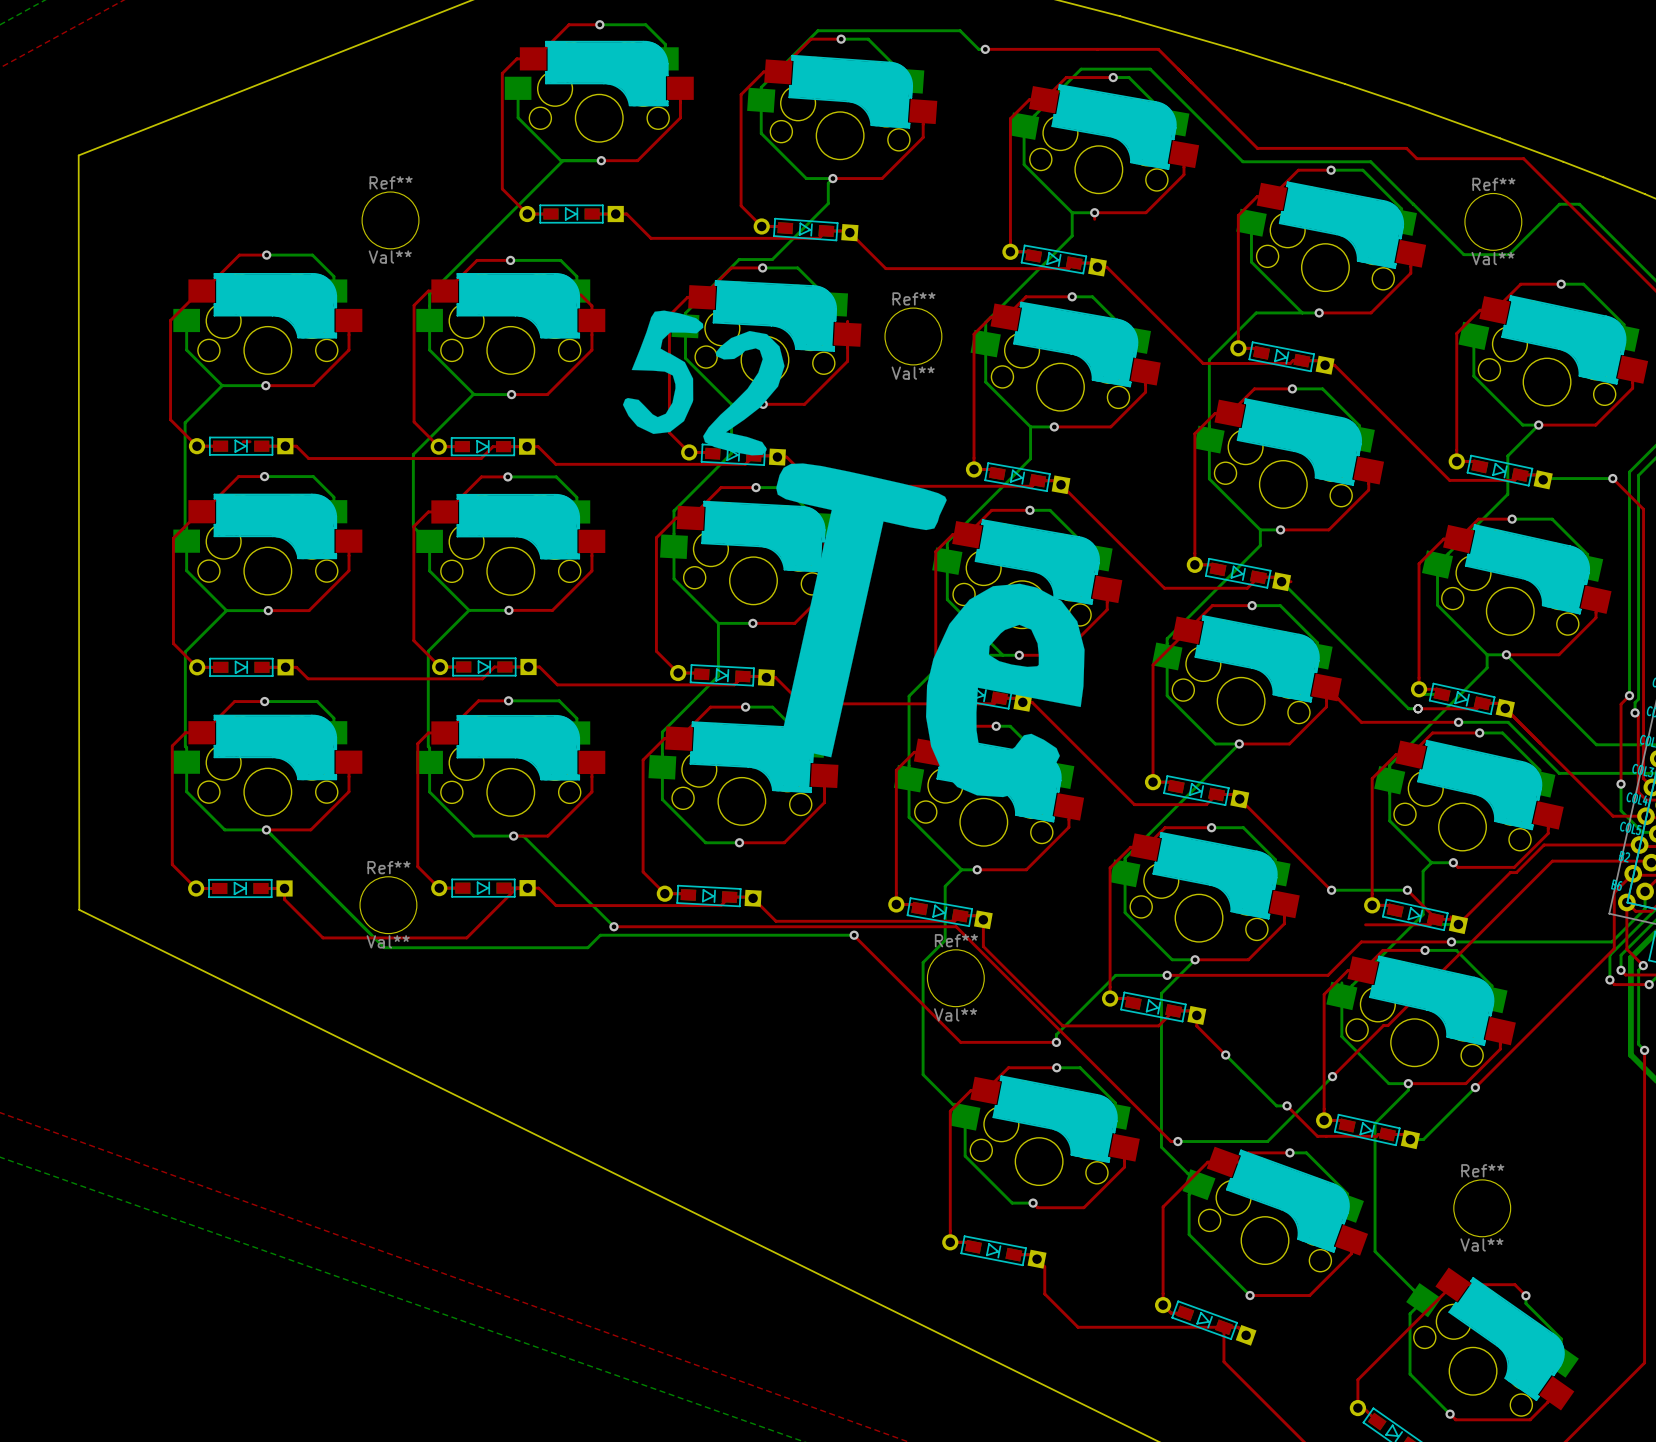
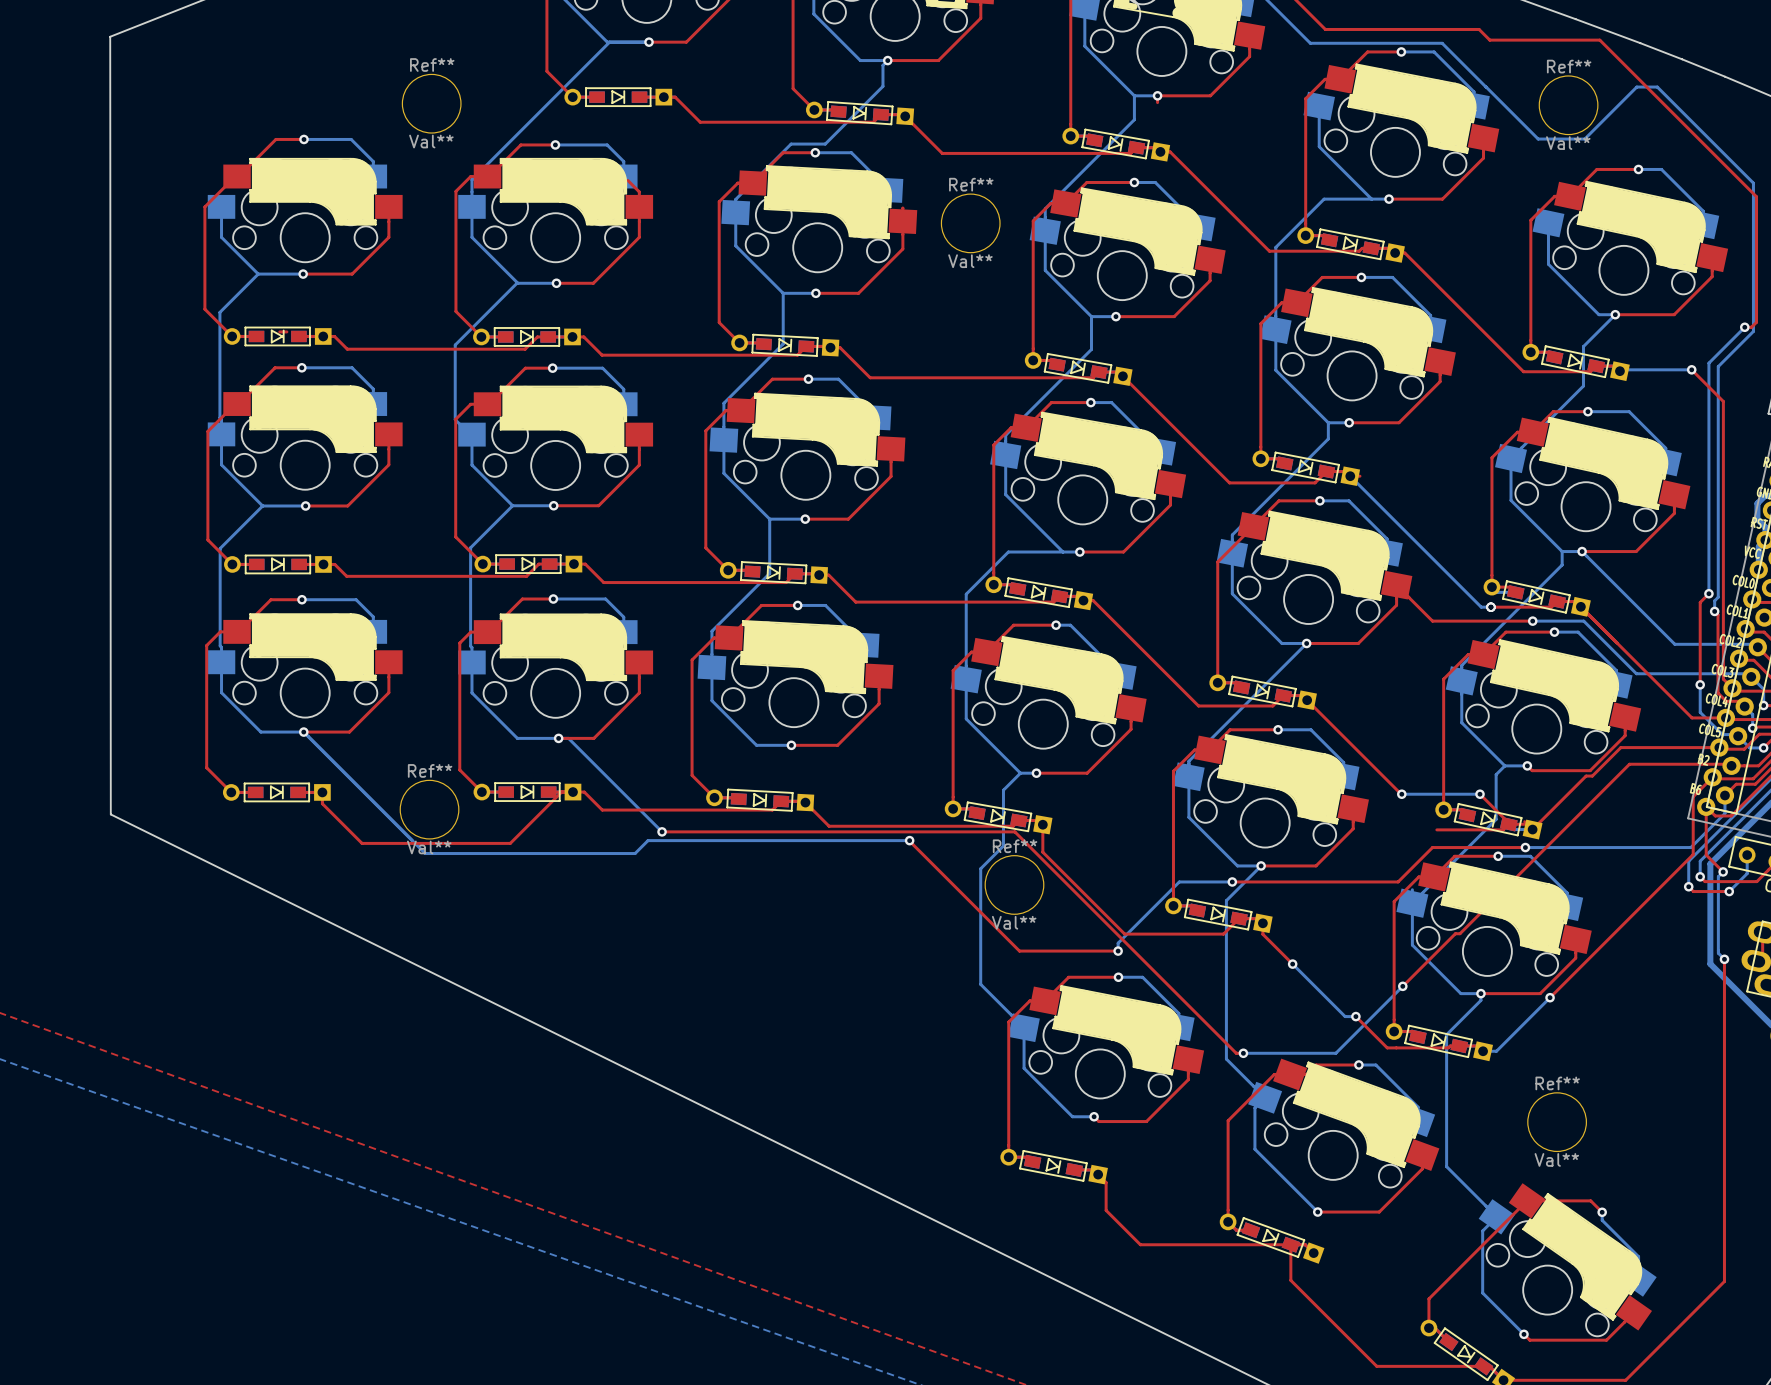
drawing: [622, 310, 1085, 798] -> none

